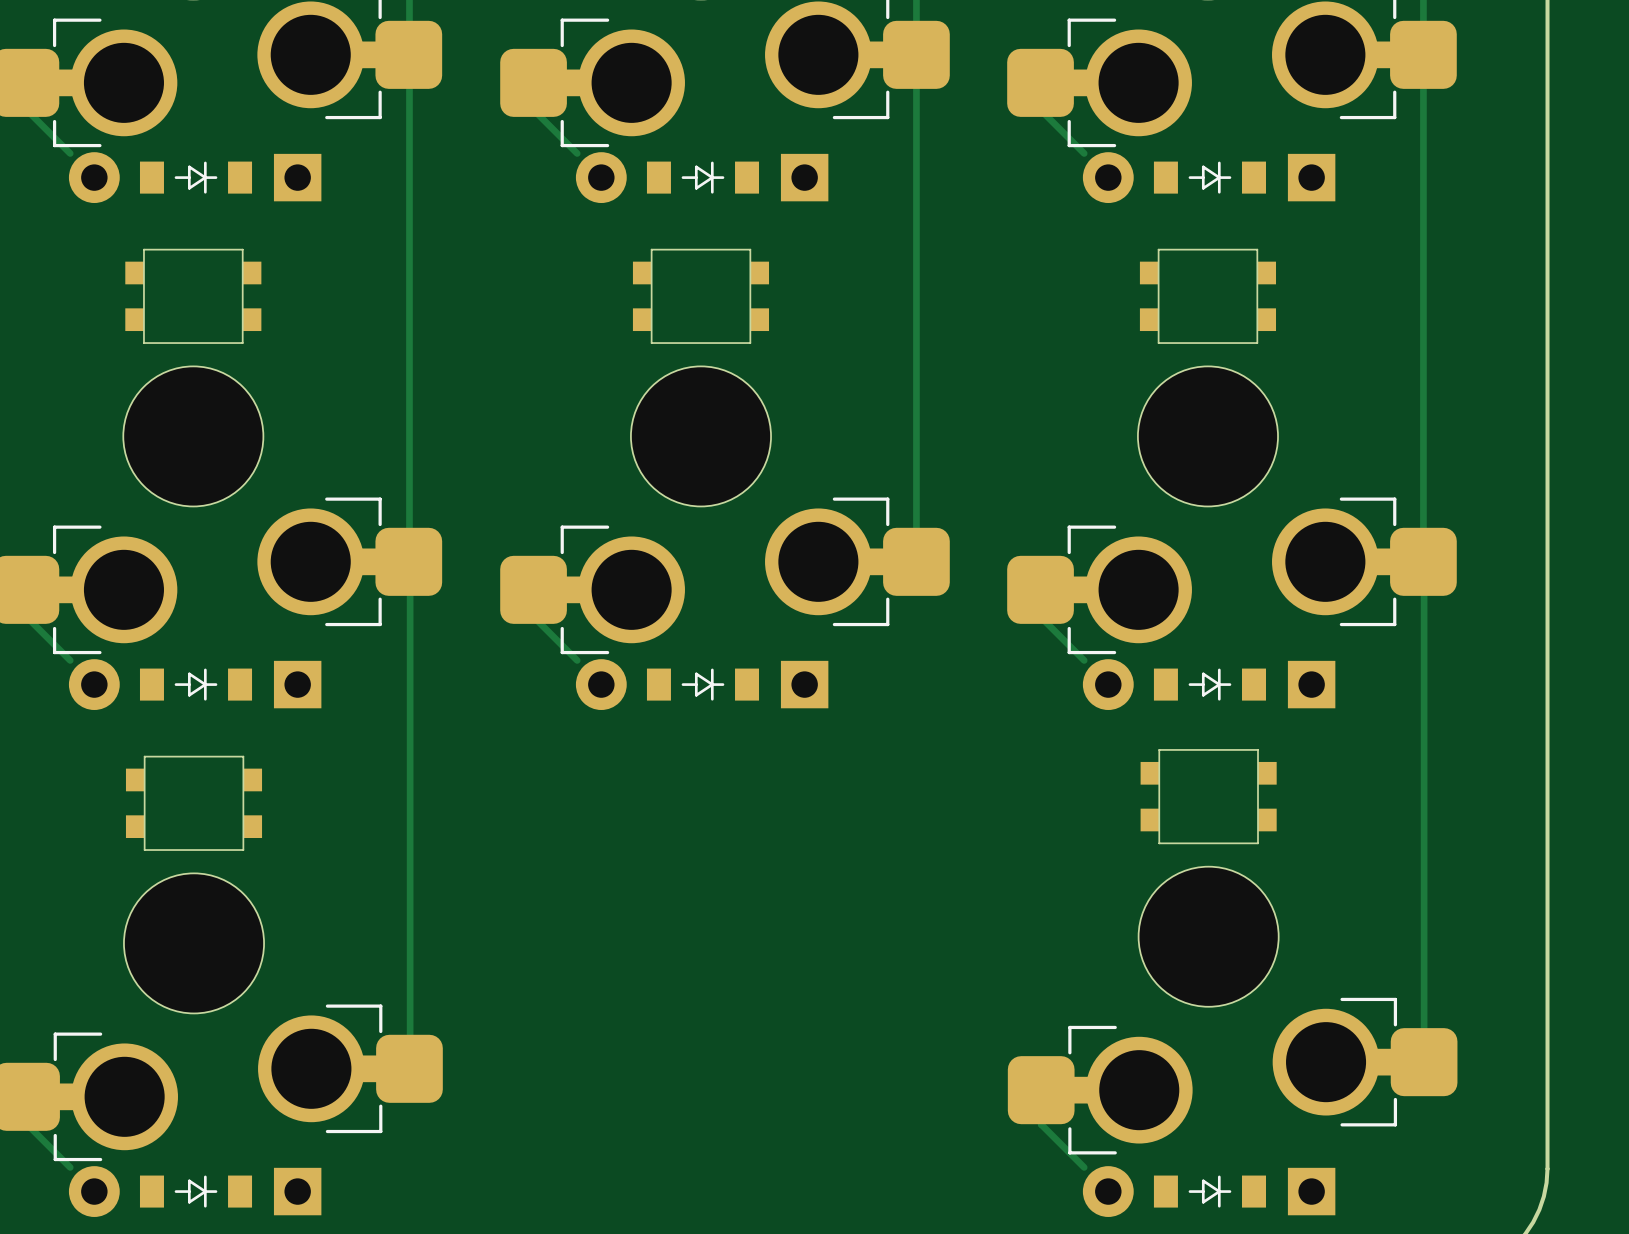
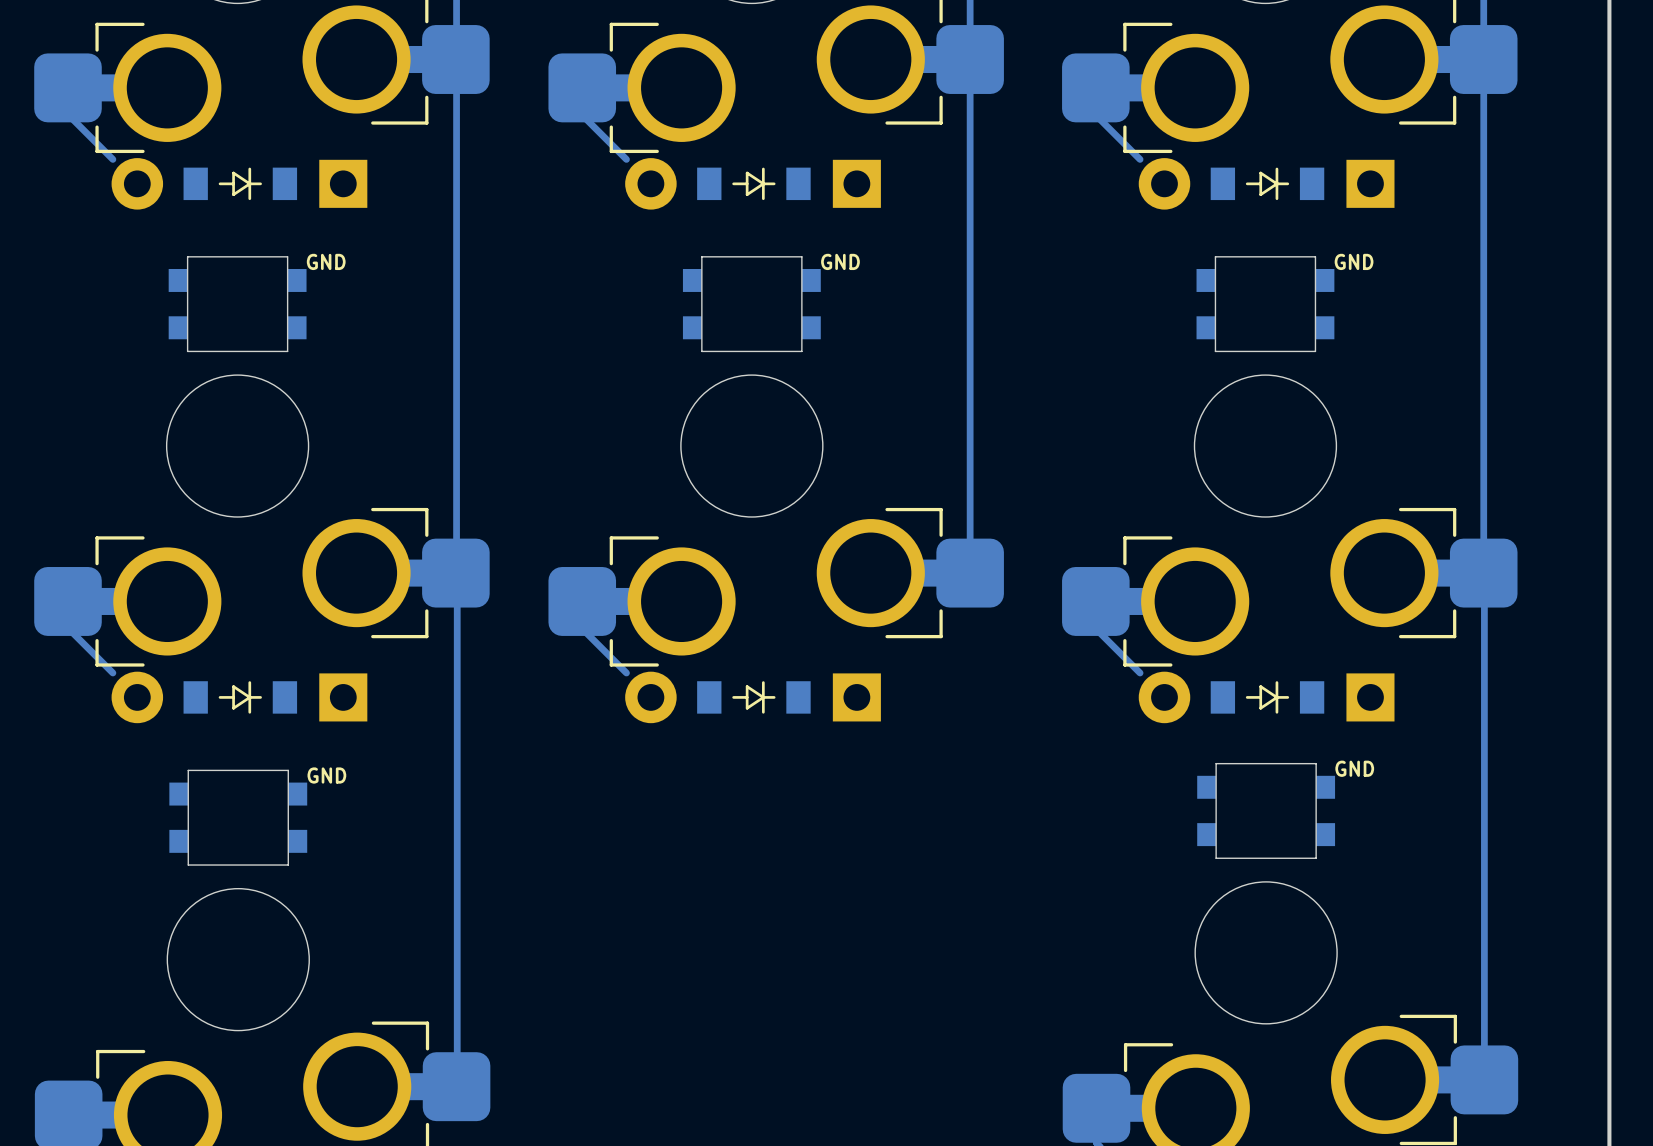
part text: none -> GND (326, 261)
part text: none -> GND (840, 261)
part text: none -> GND (1354, 261)
part text: none -> GND (1354, 768)
part text: none -> GND (326, 775)

